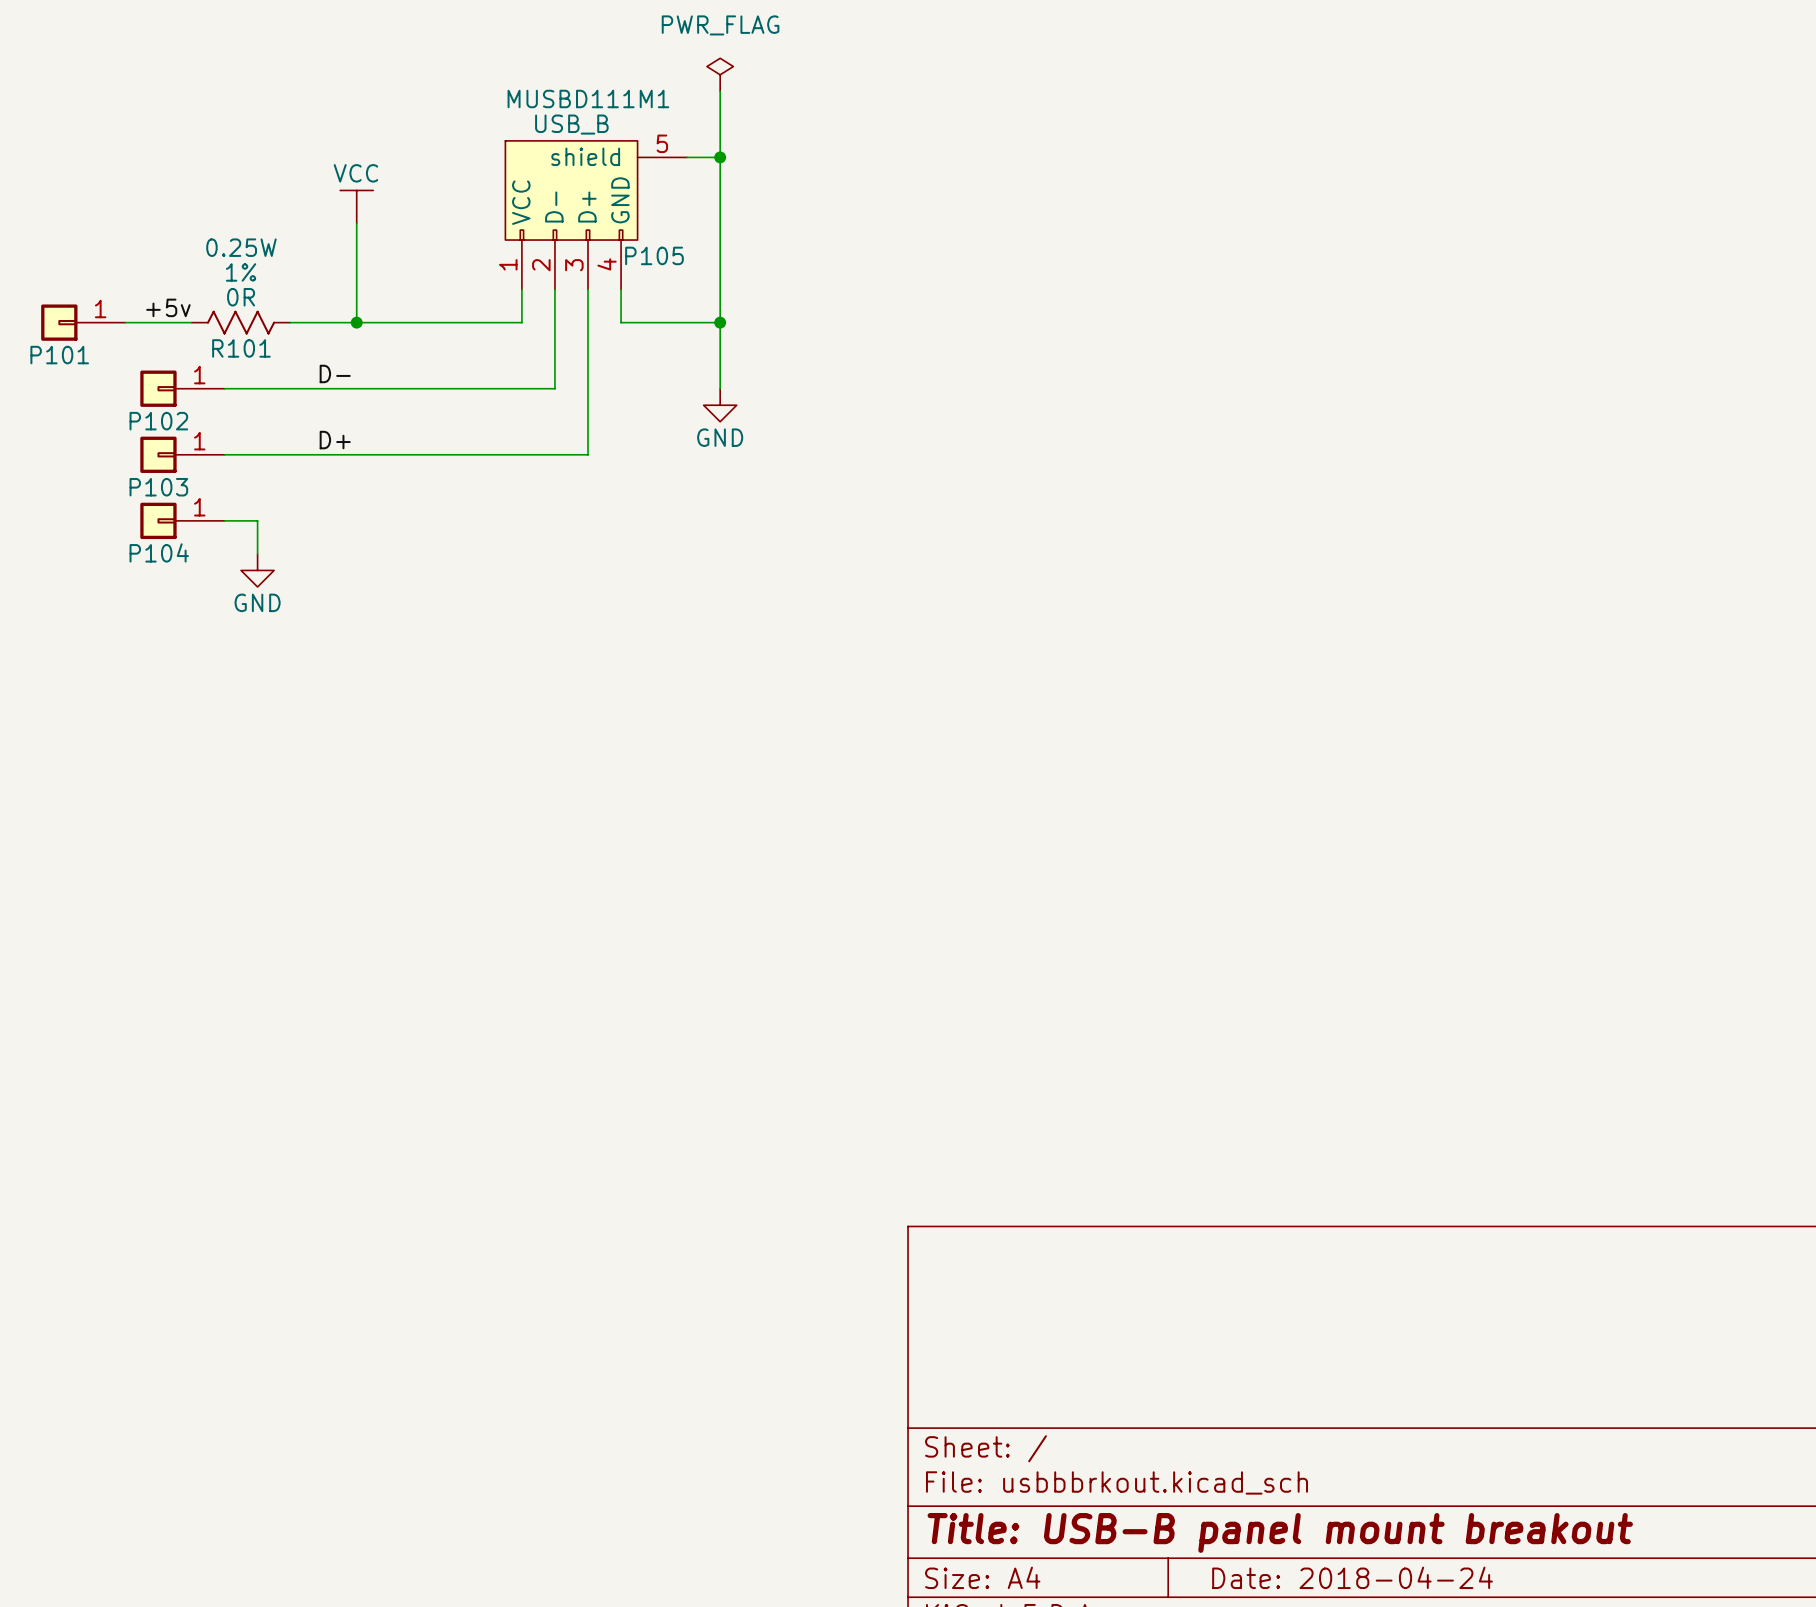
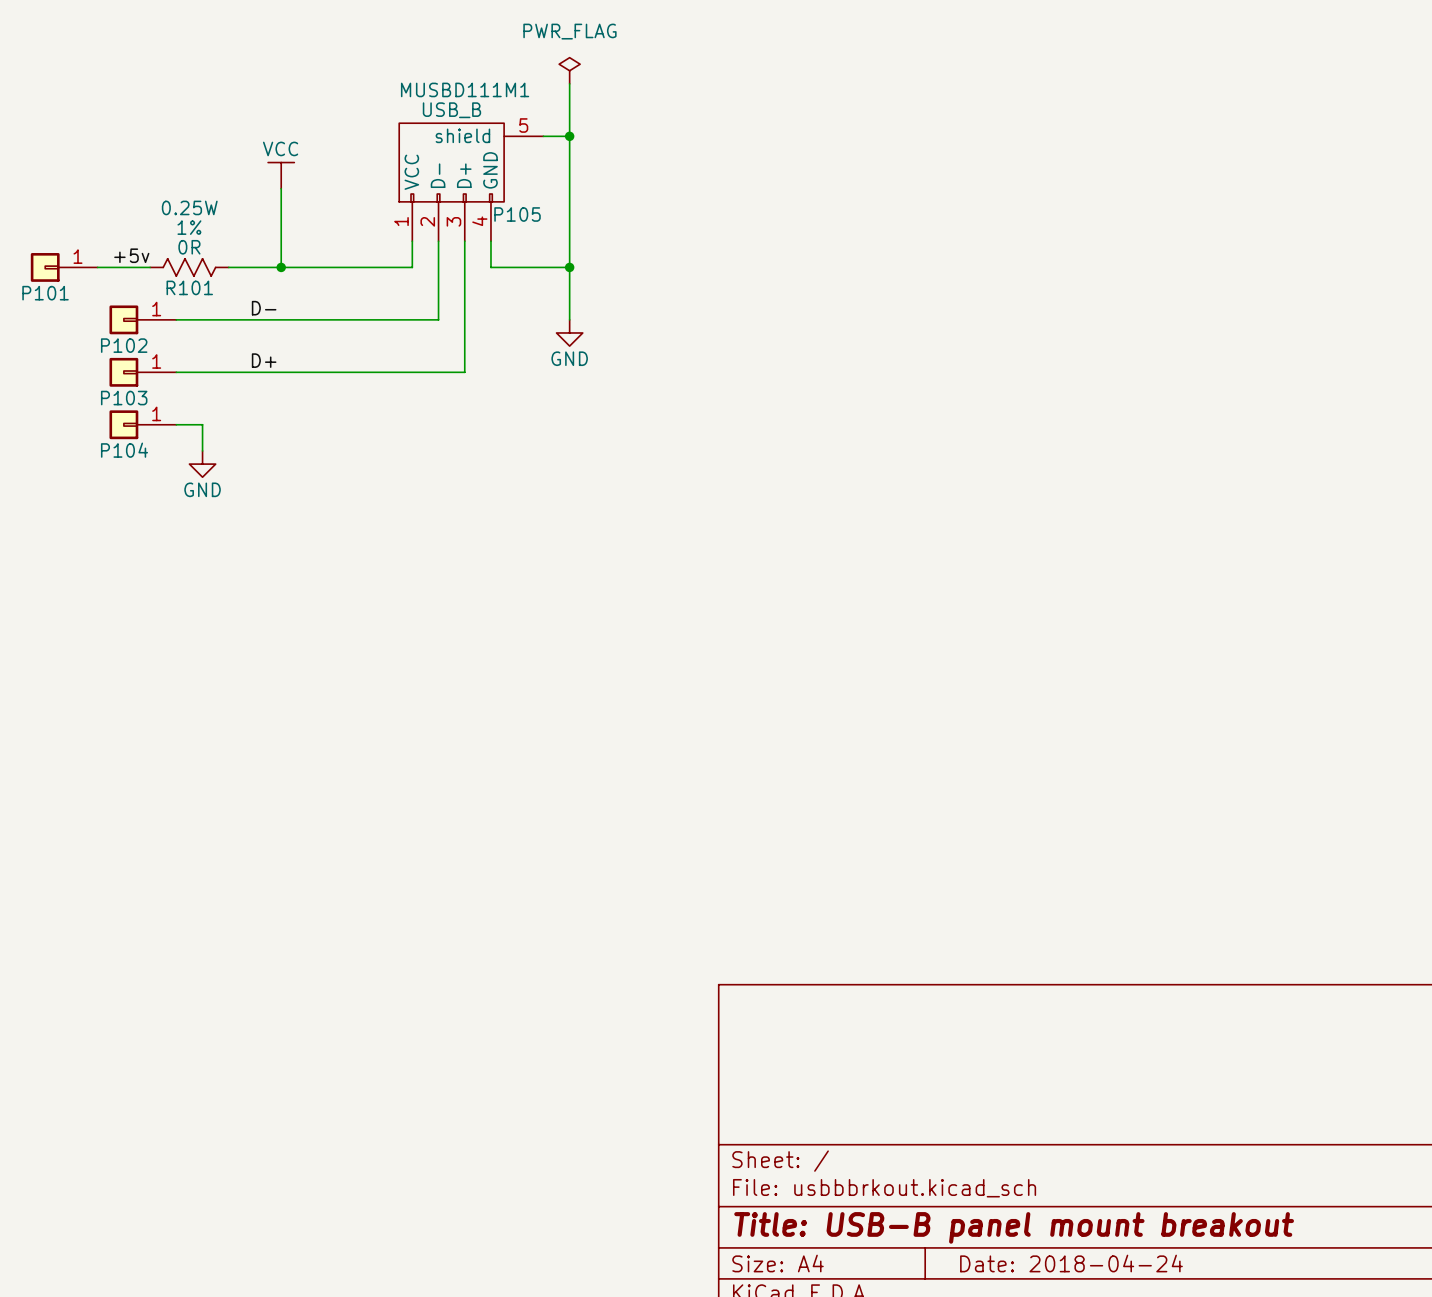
P105 symbol: [505, 140, 688, 290] -> [399, 123, 544, 242]

